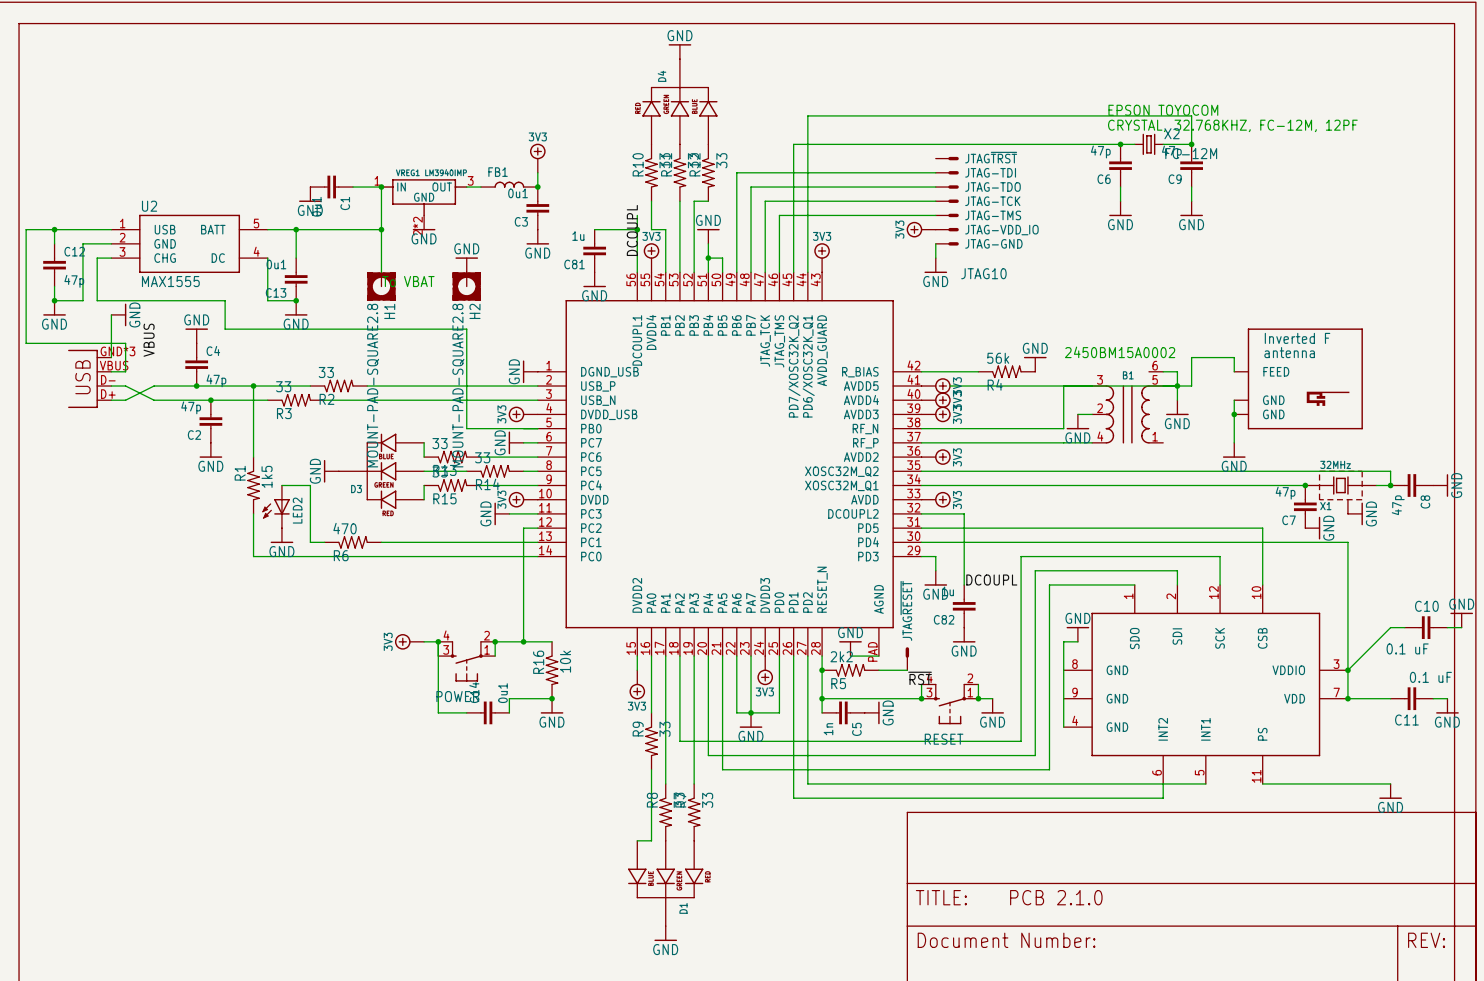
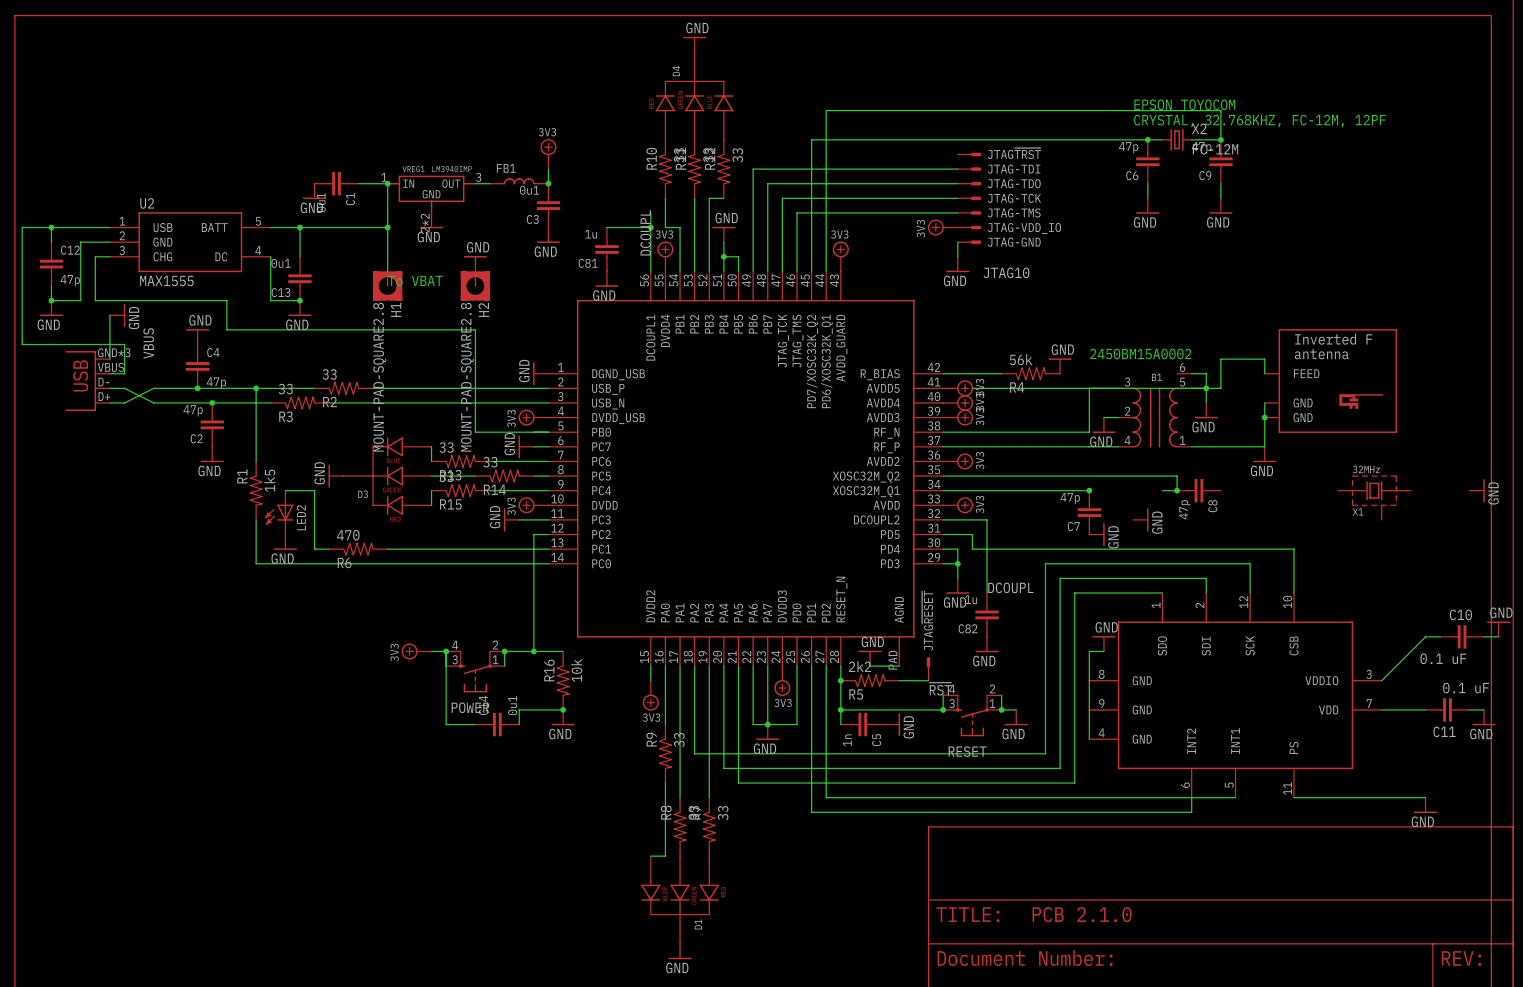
wire: (1148, 471) (1390, 471) (1390, 485) (1376, 485) -> none
wire: (1063, 485) (1134, 485) -> (1191, 446) (1264, 446)
junction: none -> (1089, 490)
wire: (1148, 485) (1305, 485) -> (1177, 490) (1177, 476)
junction: none -> (1177, 490)
junction: (1305, 485) -> none
junction: (1390, 485) -> none
C8 position: (1411, 485) -> (1198, 490)
C7 position: (1305, 506) -> (1089, 512)
power symbol: none -> GND (1140, 519)
power symbol: GND (1355, 513) -> none
wire: (949, 528) (1262, 528) (1262, 542) (1347, 542) (1347, 698) -> (972, 534) (972, 549)
power symbol: none -> GND (1097, 534)
power symbol: GND (1312, 528) -> none
wire: (935, 542) (949, 542) -> (957, 549) (957, 563)
junction: none -> (957, 563)
junction: (1347, 670) -> none
junction: (1347, 698) -> none

